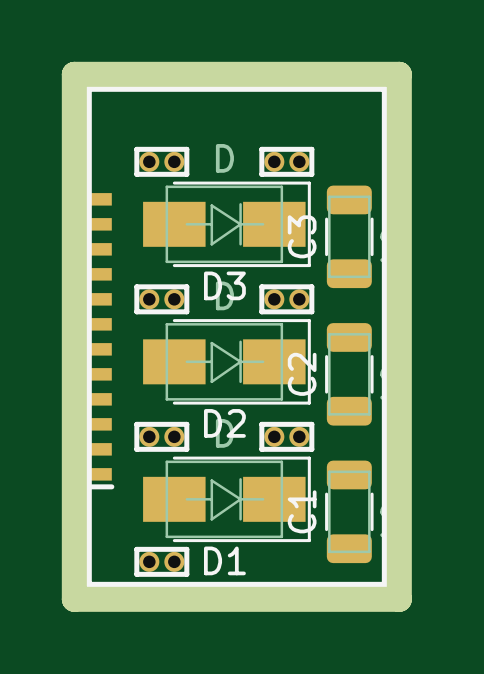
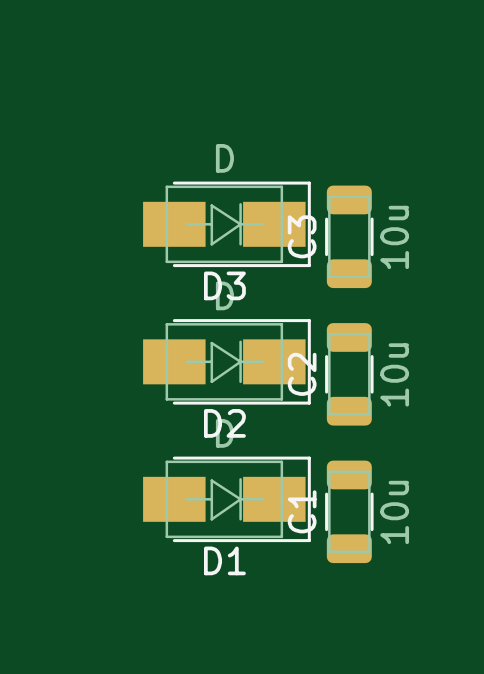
board edge: (74, 74) (74, 599) (399, 599) (399, 74) (74, 74) -> none
line: (86, 86) (86, 586) (386, 586) (386, 86) (86, 86) -> none
part: (161, 161) -> none
part: (286, 161) -> none
part: (161, 299) -> none
part: (286, 299) -> none
part: (96, 336) -> none
part: (161, 436) -> none
part: (286, 436) -> none
part: (161, 561) -> none

